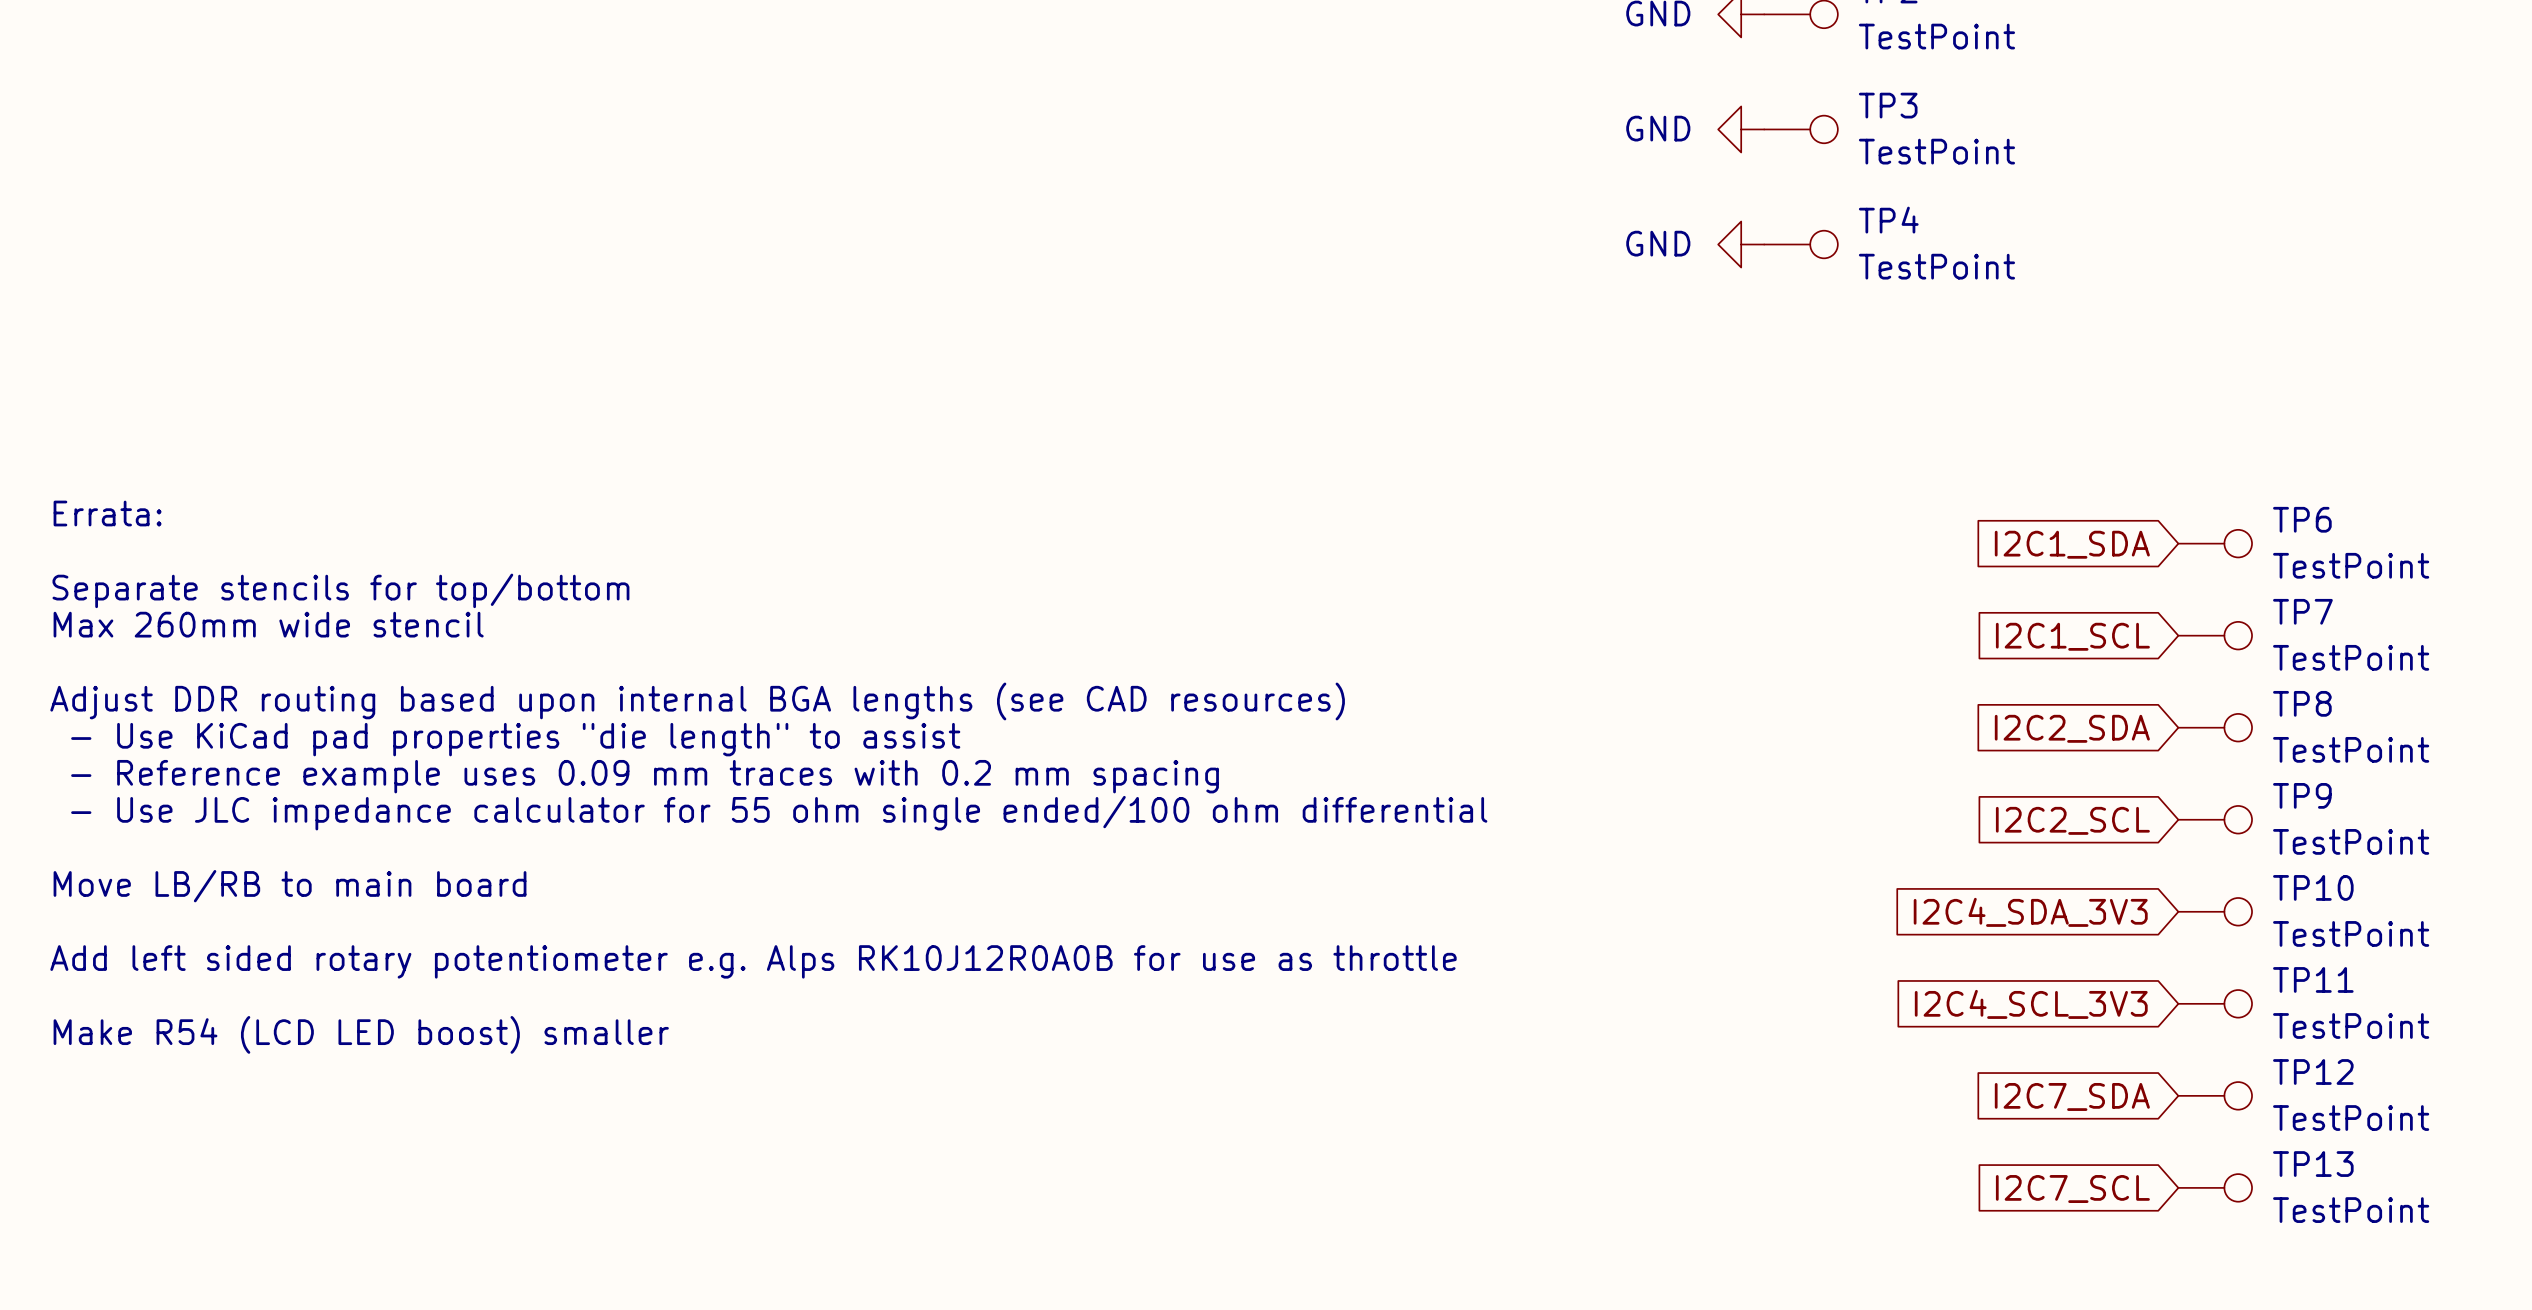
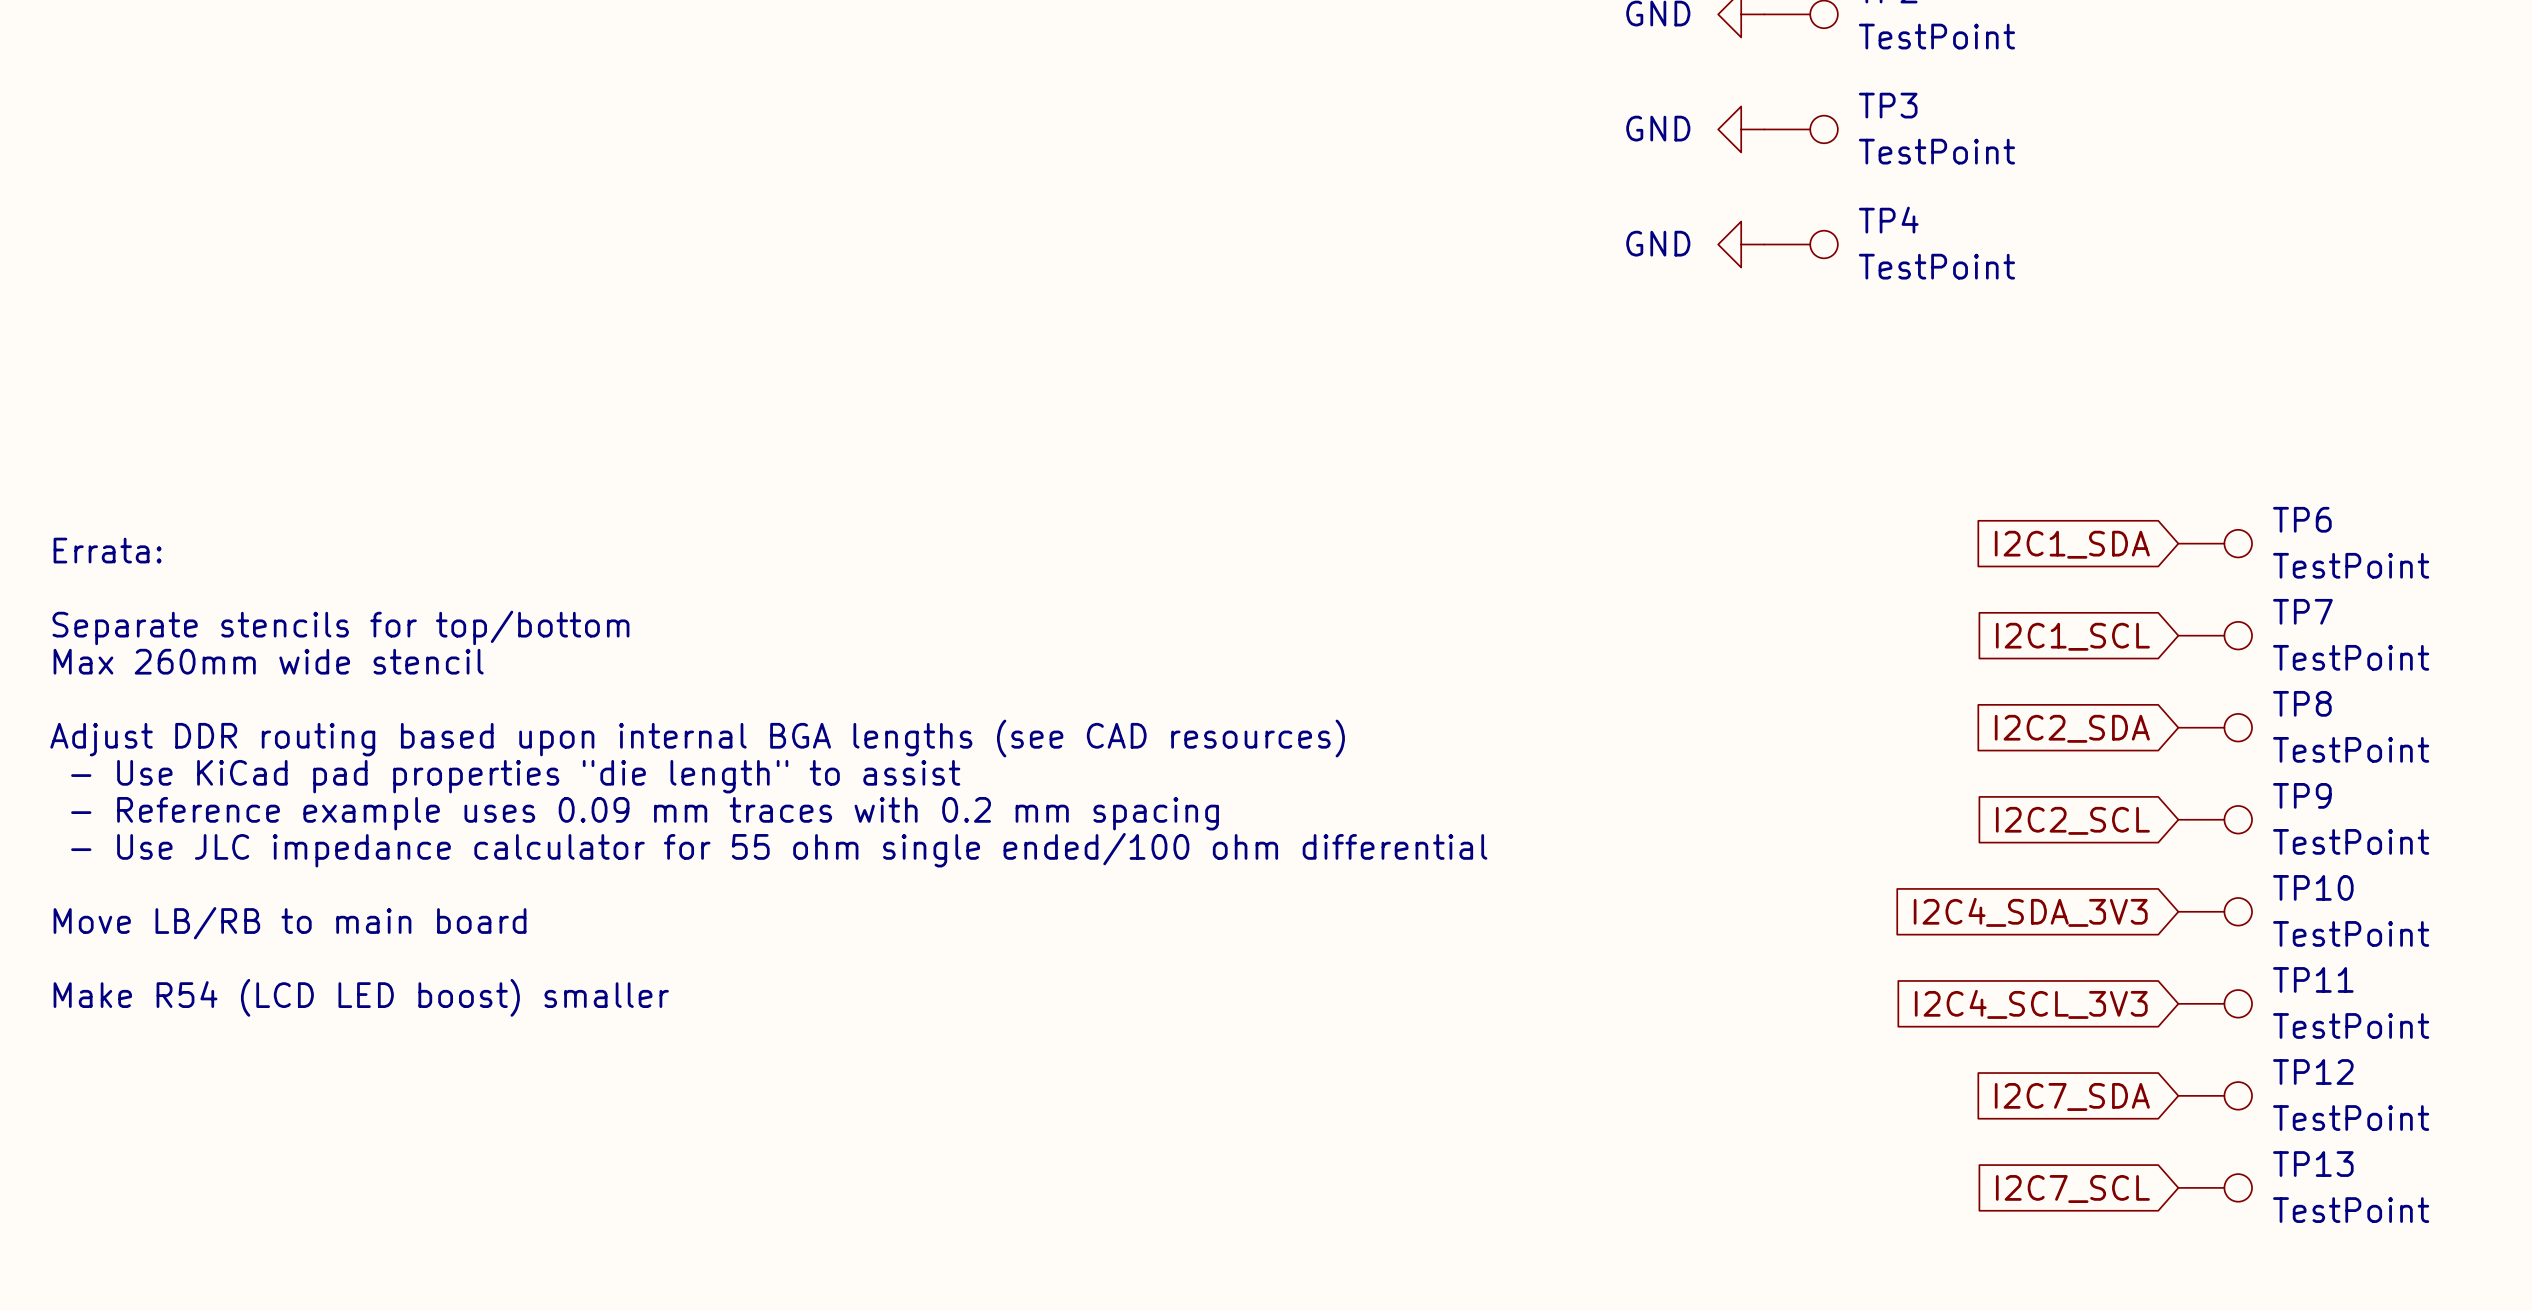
text position: Errata: (107, 513) -> Errata: (107, 550)
text: Separate stencils for top/bottom (340, 590) -> none
text: Max 260mm wide stencil (268, 624) -> Separate stencils for top/bottom (340, 627)
text: none -> Max 260mm wide stencil (268, 661)
text: Adjust DDR routing based upon internal BGA lengths (see CAD resources) (697, 701) -> none
text: - Use KiCad pad properties "die length" to assist (515, 739) -> Adjust DDR routing based upon internal BGA lengths (see CAD resources) (697, 738)
text: - Reference example uses 0.09 mm traces with 0.2 mm spacing (645, 776) -> - Use KiCad pad properties "die length" to assist (515, 776)
text: - Use JLC impedance calculator for 55 ohm single ended/100 ohm differential (779, 813) -> - Reference example uses 0.09 mm traces with 0.2 mm spacing (645, 813)
text: none -> - Use JLC impedance calculator for 55 ohm single ended/100 ohm differential (779, 850)
text position: Move LB/RB to main board (290, 886) -> Move LB/RB to main board (290, 923)
text: Add left sided rotary potentiometer e.g. Alps RK10J12R0A0B for use as throttle (753, 961) -> none
text position: Make R54 (LCD LED boost) smaller (361, 1034) -> Make R54 (LCD LED boost) smaller (361, 997)

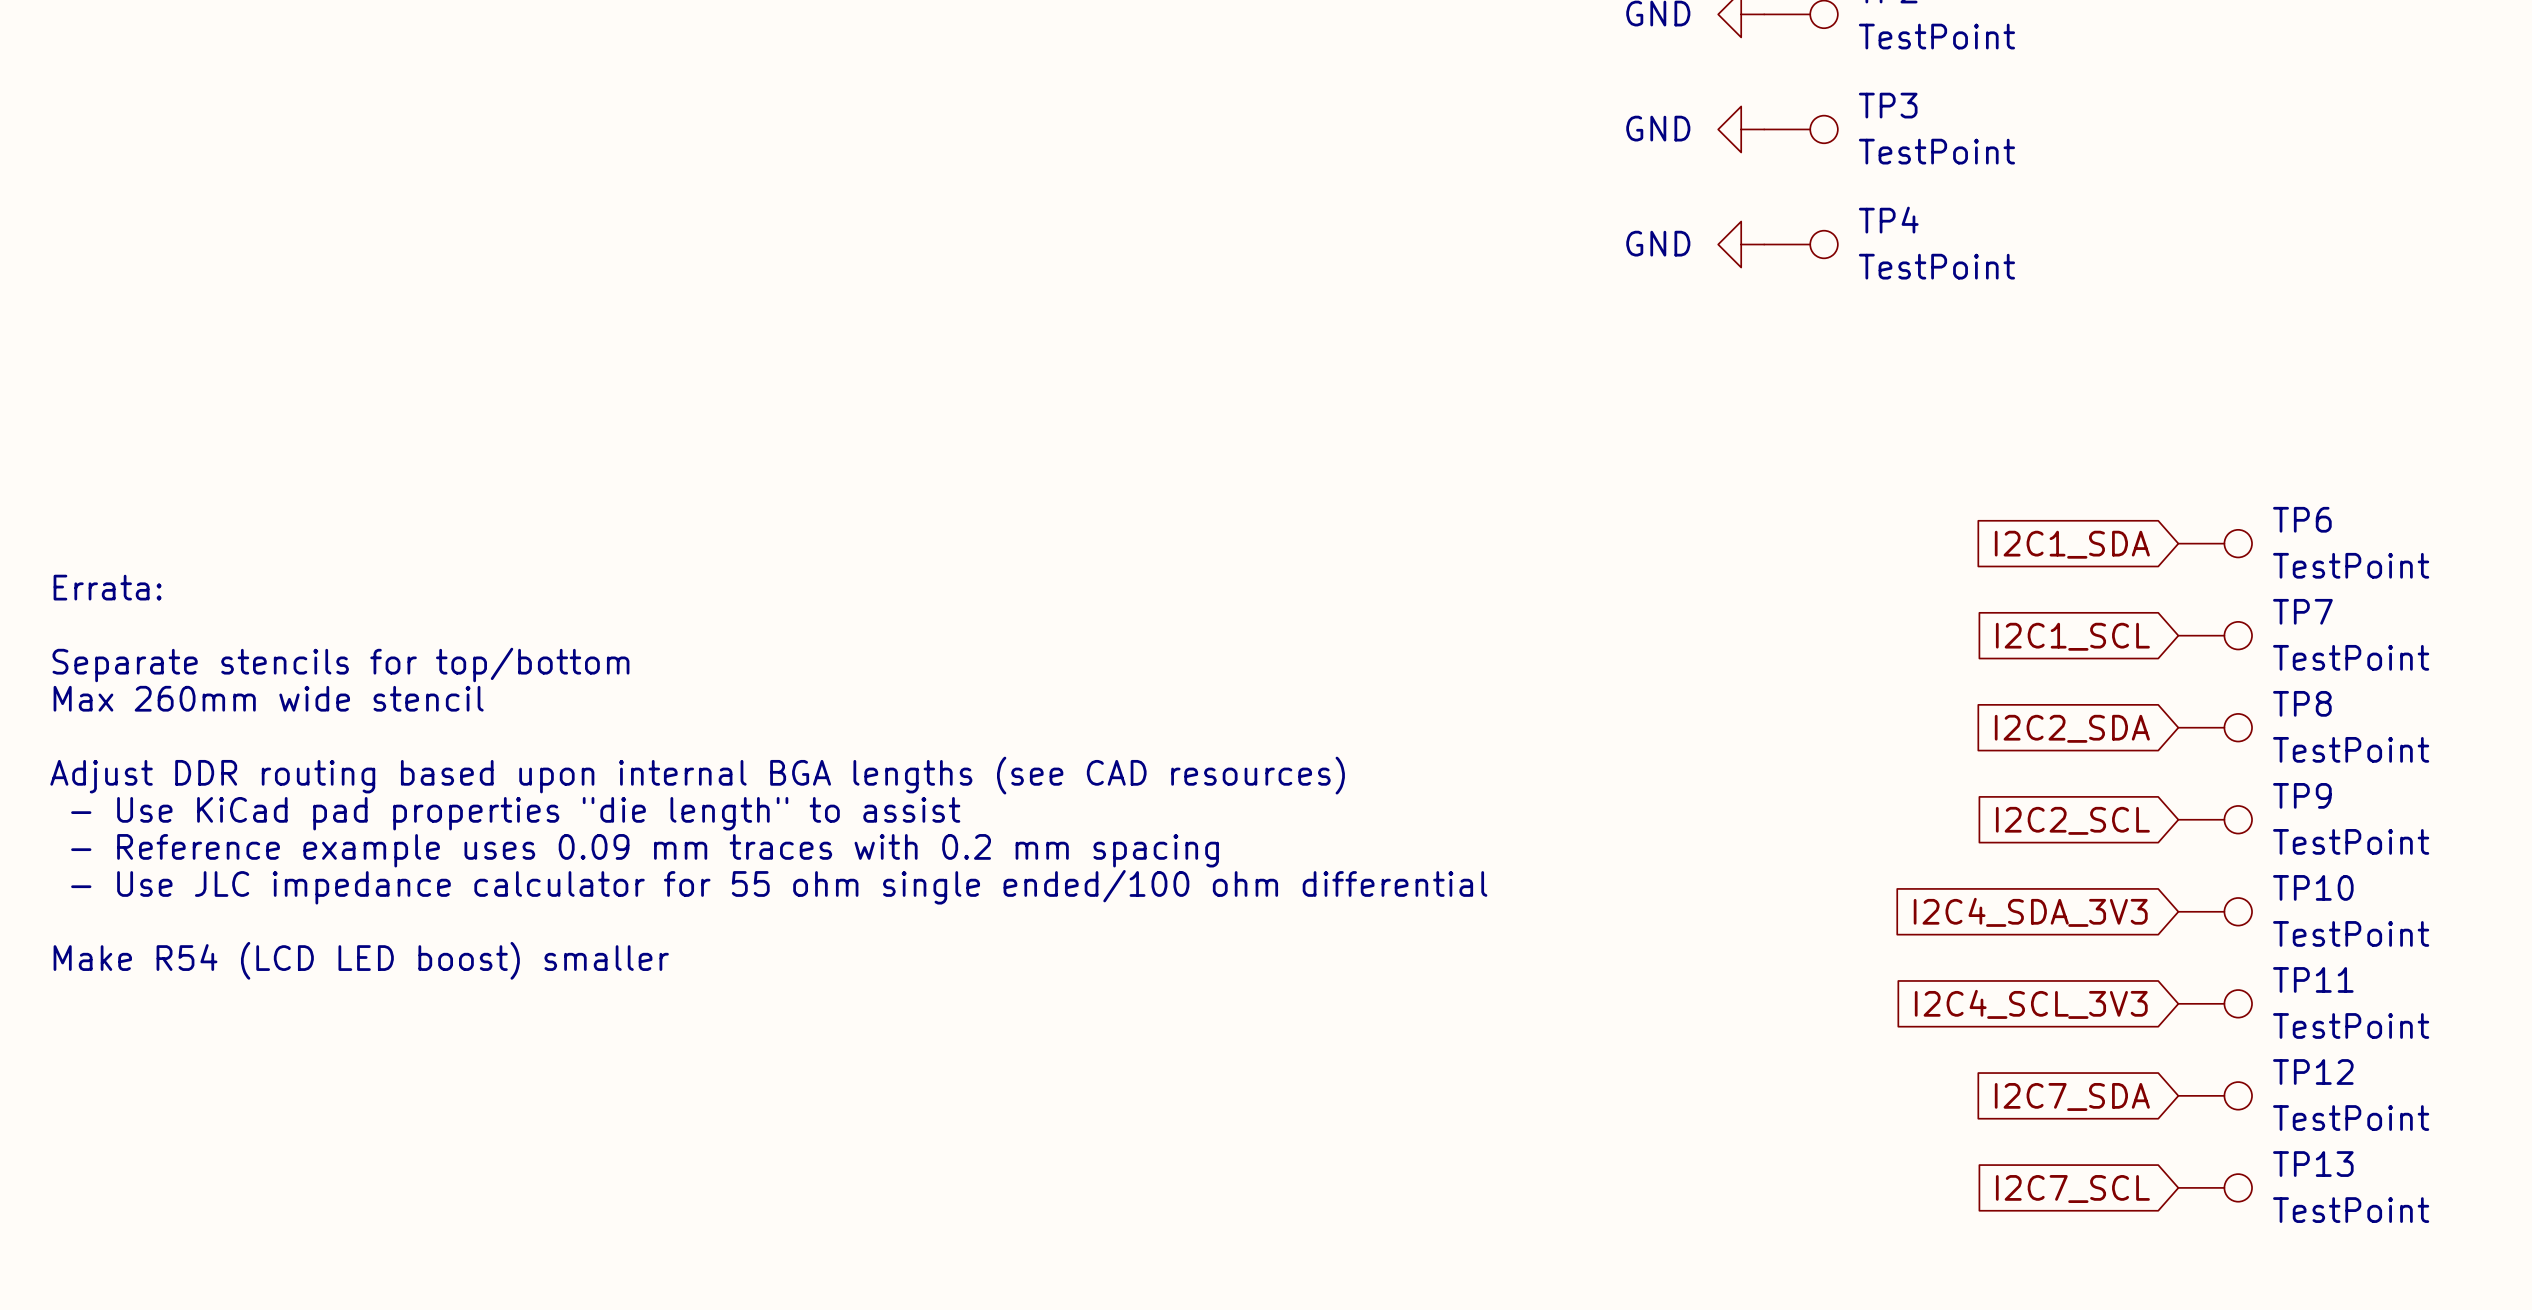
text position: Errata: (107, 550) -> Errata: (107, 587)
text: Separate stencils for top/bottom (340, 627) -> none
text: Max 260mm wide stencil (268, 661) -> Separate stencils for top/bottom (340, 664)
text: none -> Max 260mm wide stencil (268, 698)
text: Adjust DDR routing based upon internal BGA lengths (see CAD resources) (697, 738) -> none
text: - Use KiCad pad properties "die length" to assist (515, 776) -> Adjust DDR routing based upon internal BGA lengths (see CAD resources) (697, 775)
text: - Reference example uses 0.09 mm traces with 0.2 mm spacing (645, 813) -> - Use KiCad pad properties "die length" to assist (515, 813)
text: - Use JLC impedance calculator for 55 ohm single ended/100 ohm differential (779, 850) -> - Reference example uses 0.09 mm traces with 0.2 mm spacing (645, 850)
text: none -> - Use JLC impedance calculator for 55 ohm single ended/100 ohm differential (779, 887)
text: Move LB/RB to main board (290, 923) -> none
text position: Make R54 (LCD LED boost) smaller (361, 997) -> Make R54 (LCD LED boost) smaller (361, 960)

